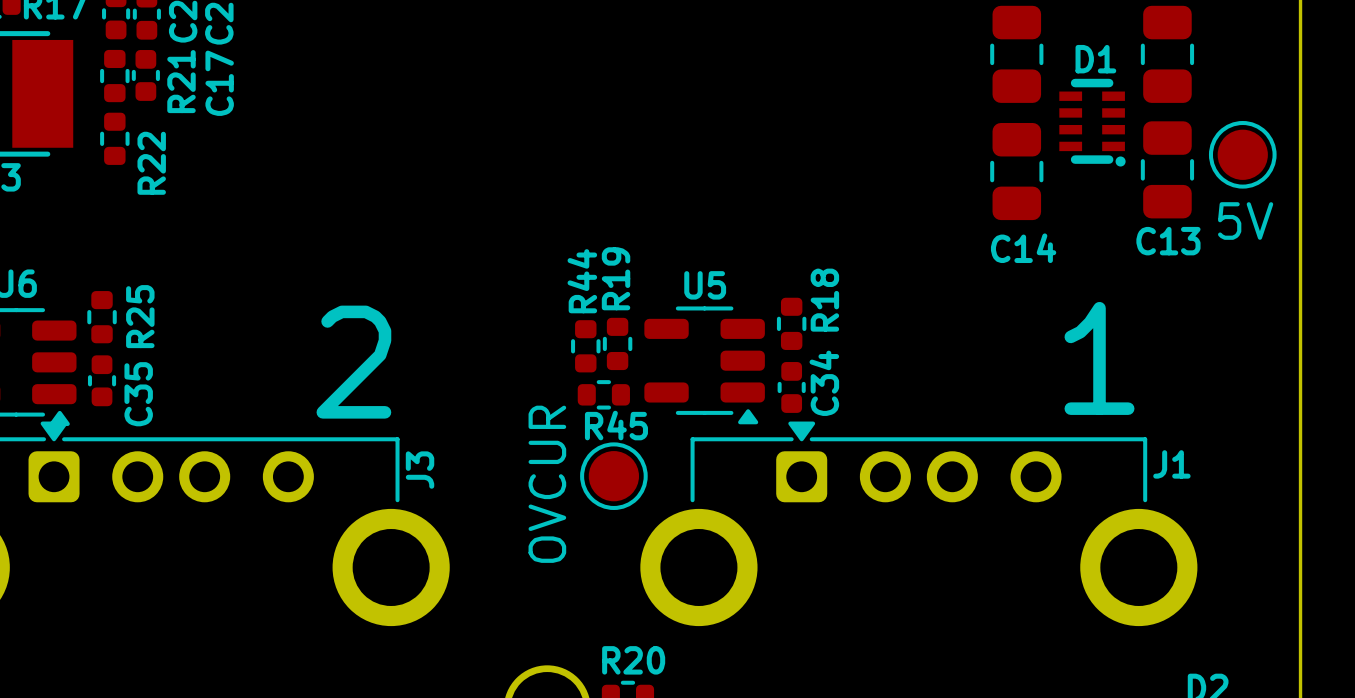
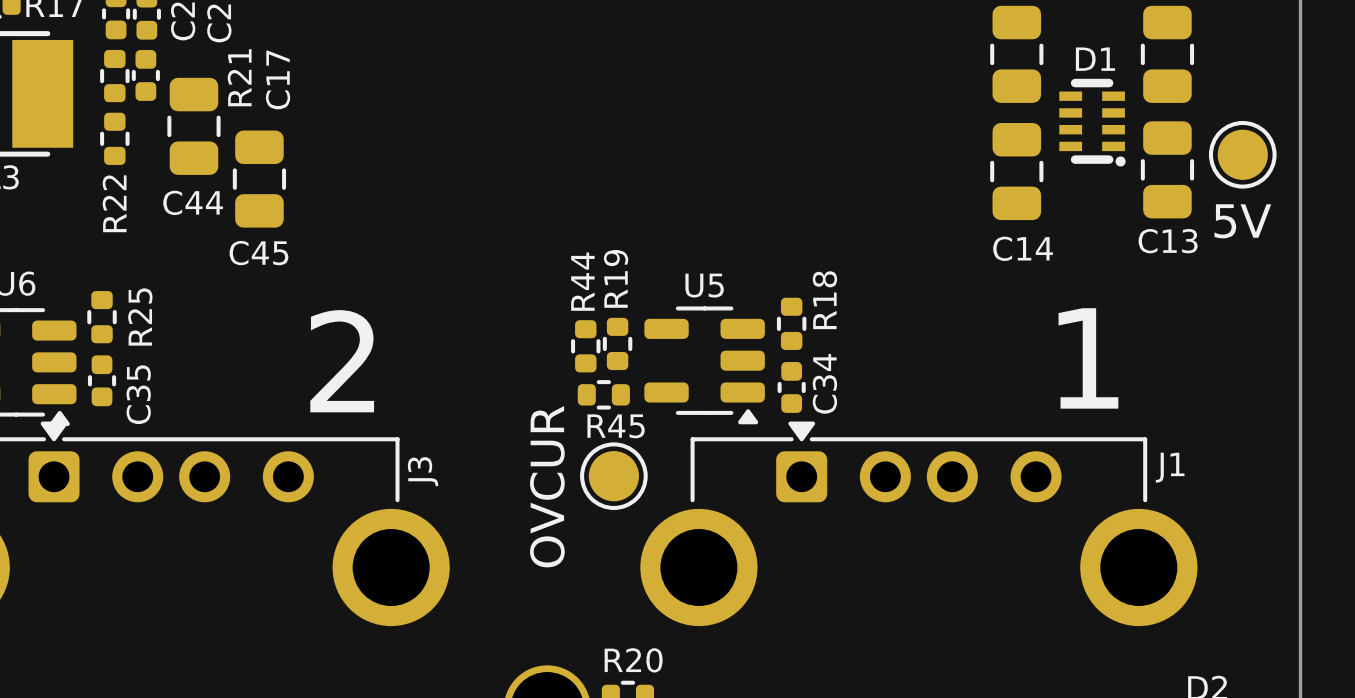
R21 name position: R21 (181, 81) -> R21 (239, 77)
C17 name position: C17 (219, 83) -> C17 (278, 79)
C44: none -> (193, 126)
R22 name position: R22 (151, 163) -> R22 (114, 203)
C45: none -> (259, 179)

